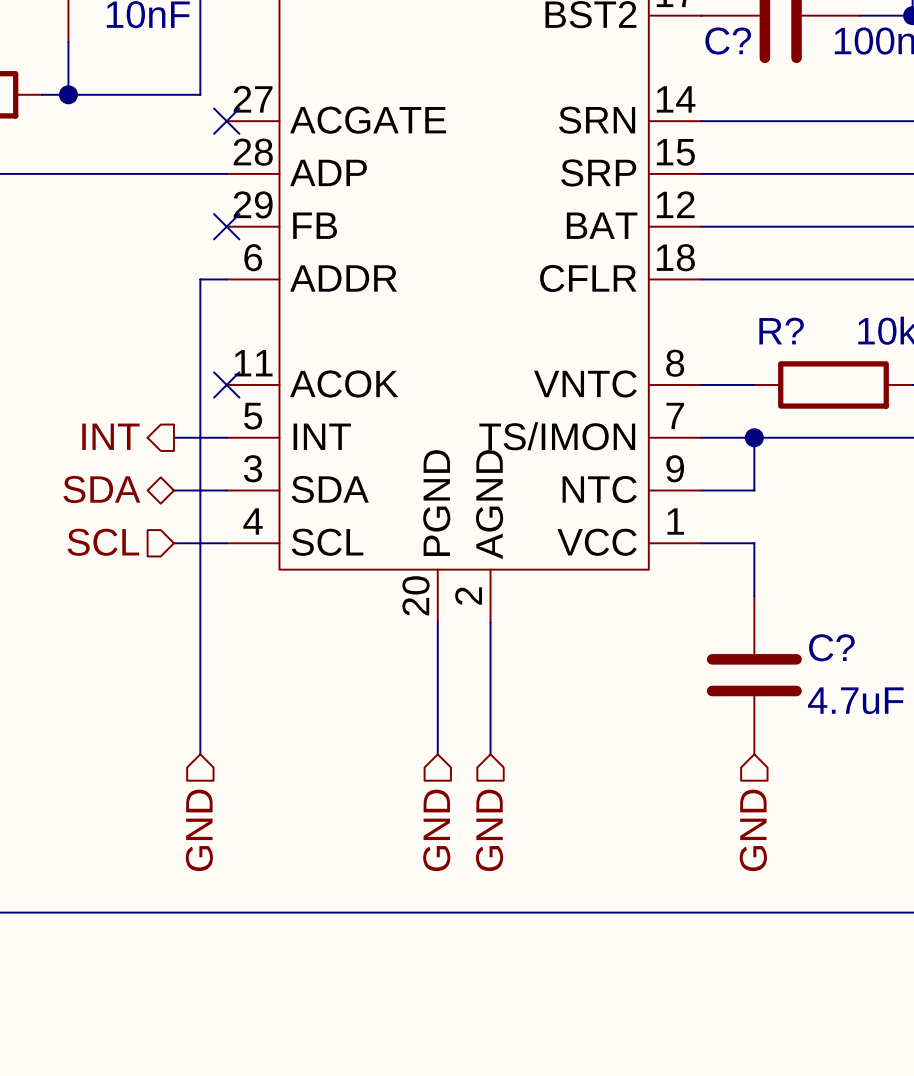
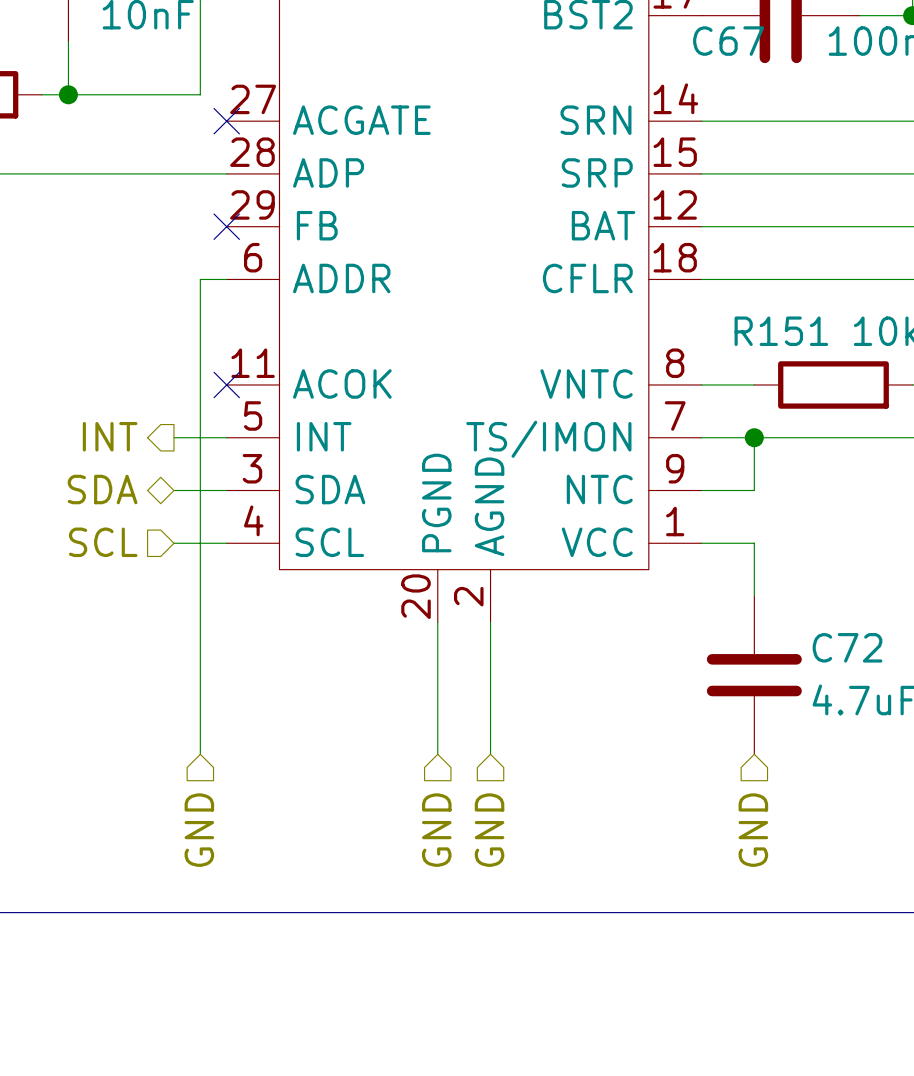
C? name: C? (728, 41) -> C67 (728, 41)
R? name: R? (781, 331) -> R151 (781, 331)
C? name: C? (831, 647) -> C72 (847, 647)

